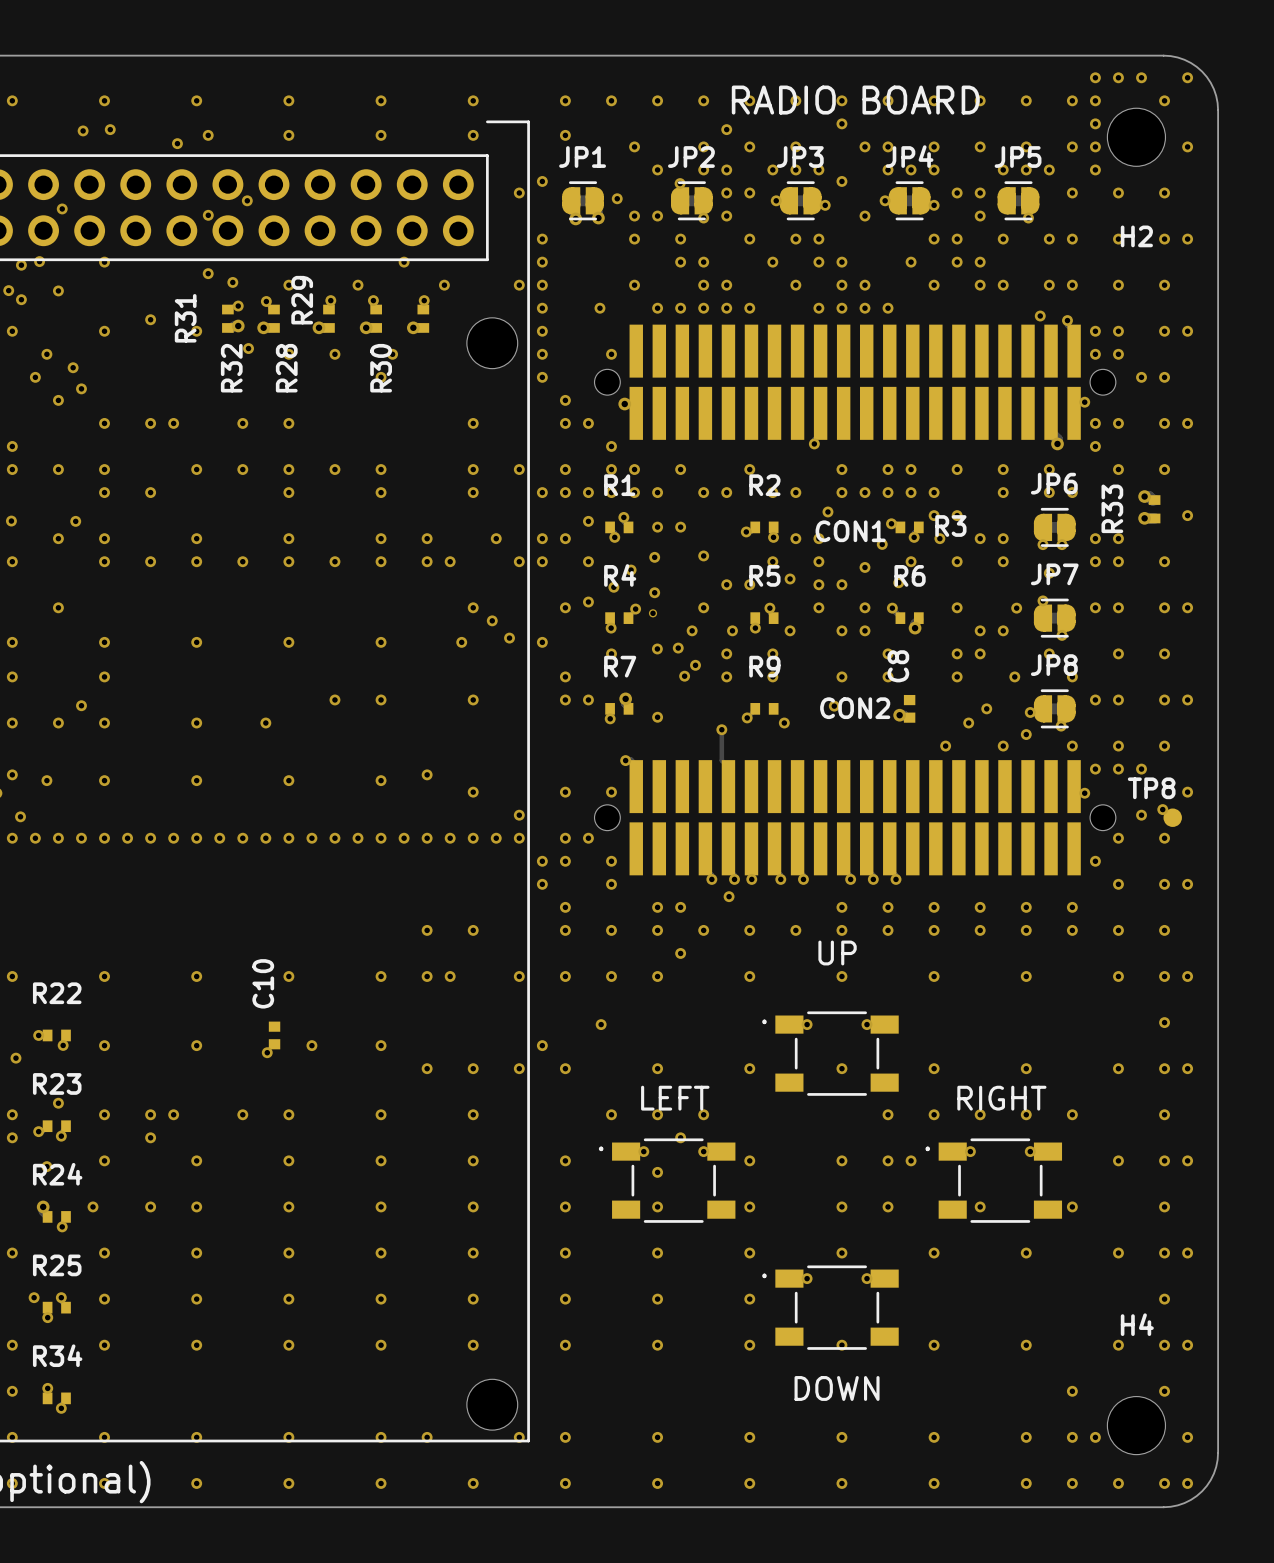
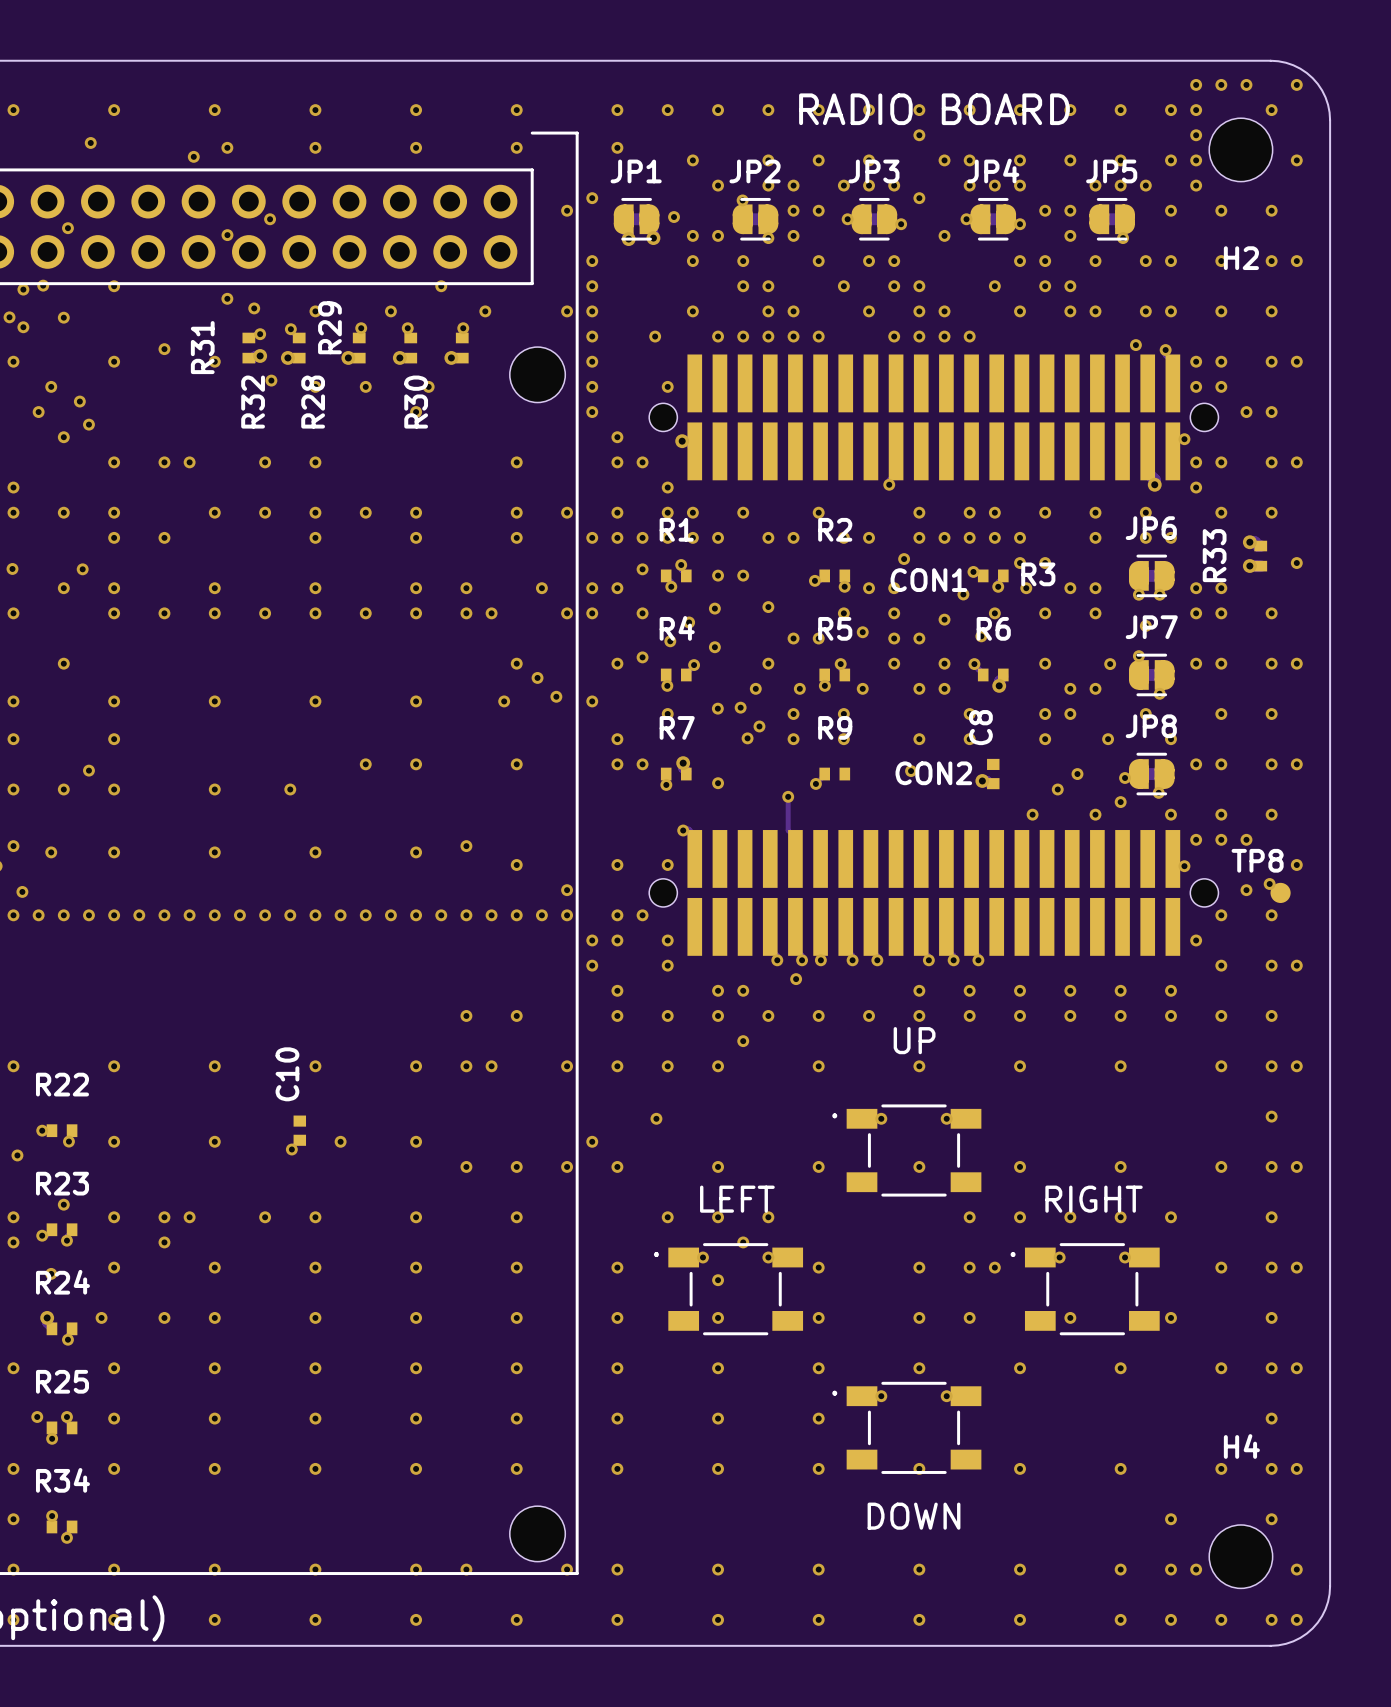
via: (110, 129) -> none
via: (726, 129) -> none
via: (653, 613) -> none
via: (784, 723) -> none

